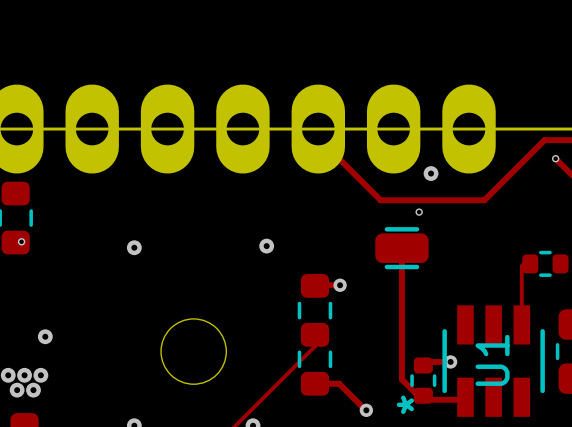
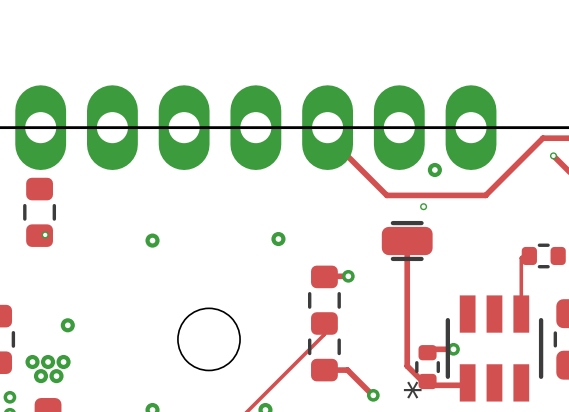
U1 name: U1 (492, 360) -> none

